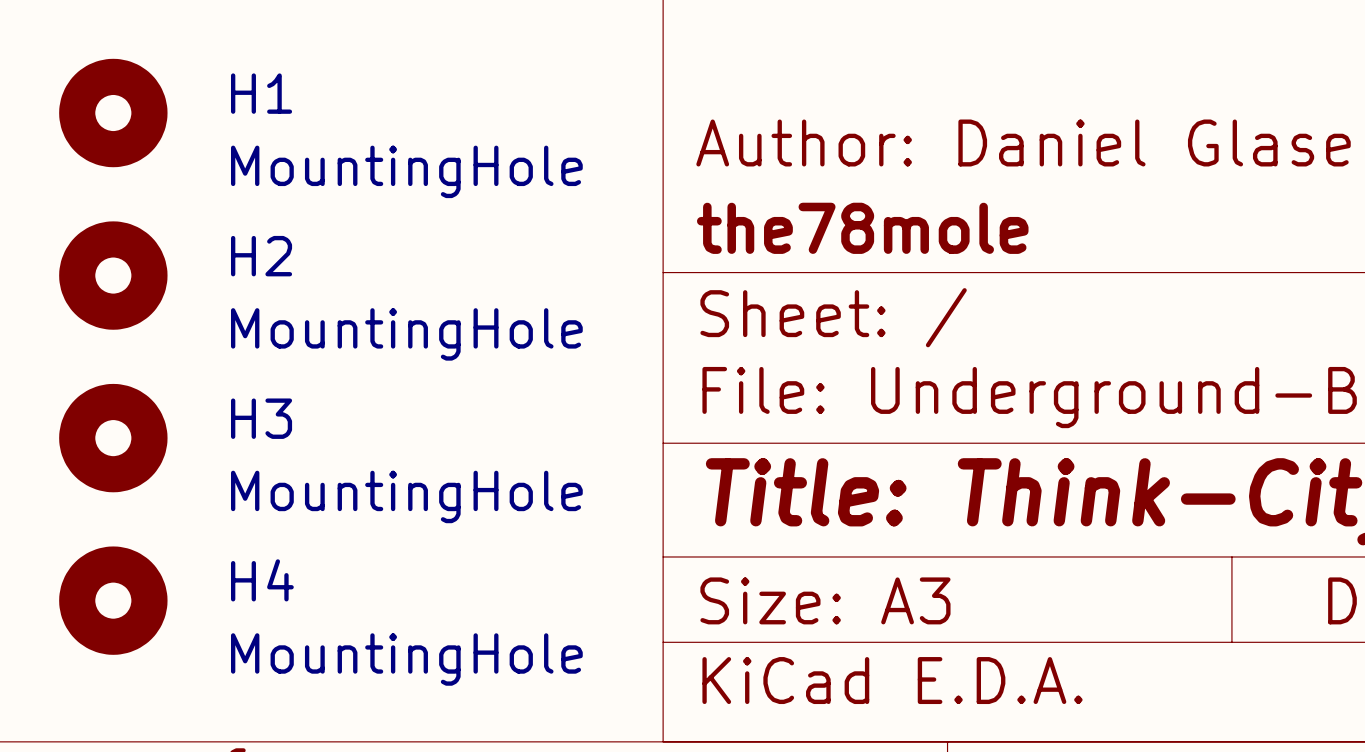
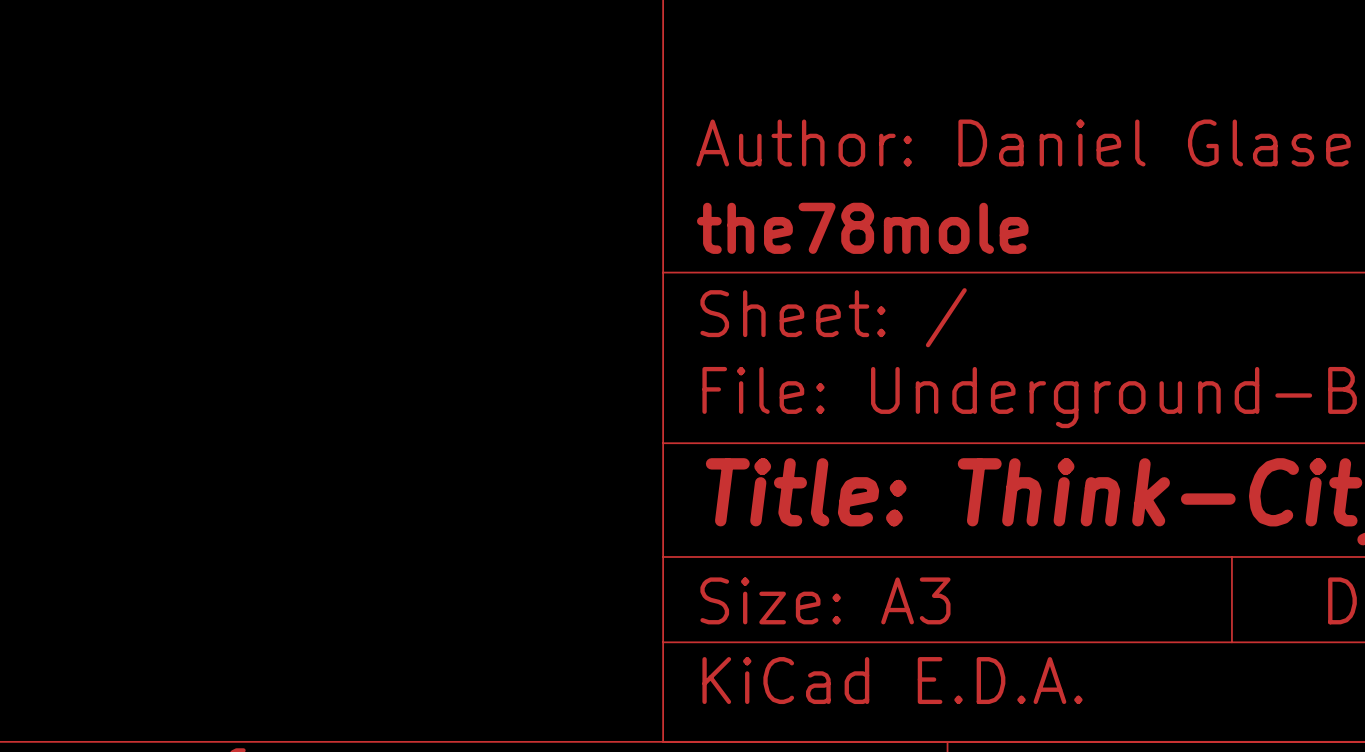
H1: MountingHole (113, 113) -> none
H2: MountingHole (113, 275) -> none
H3: MountingHole (113, 438) -> none
H4: MountingHole (113, 600) -> none

